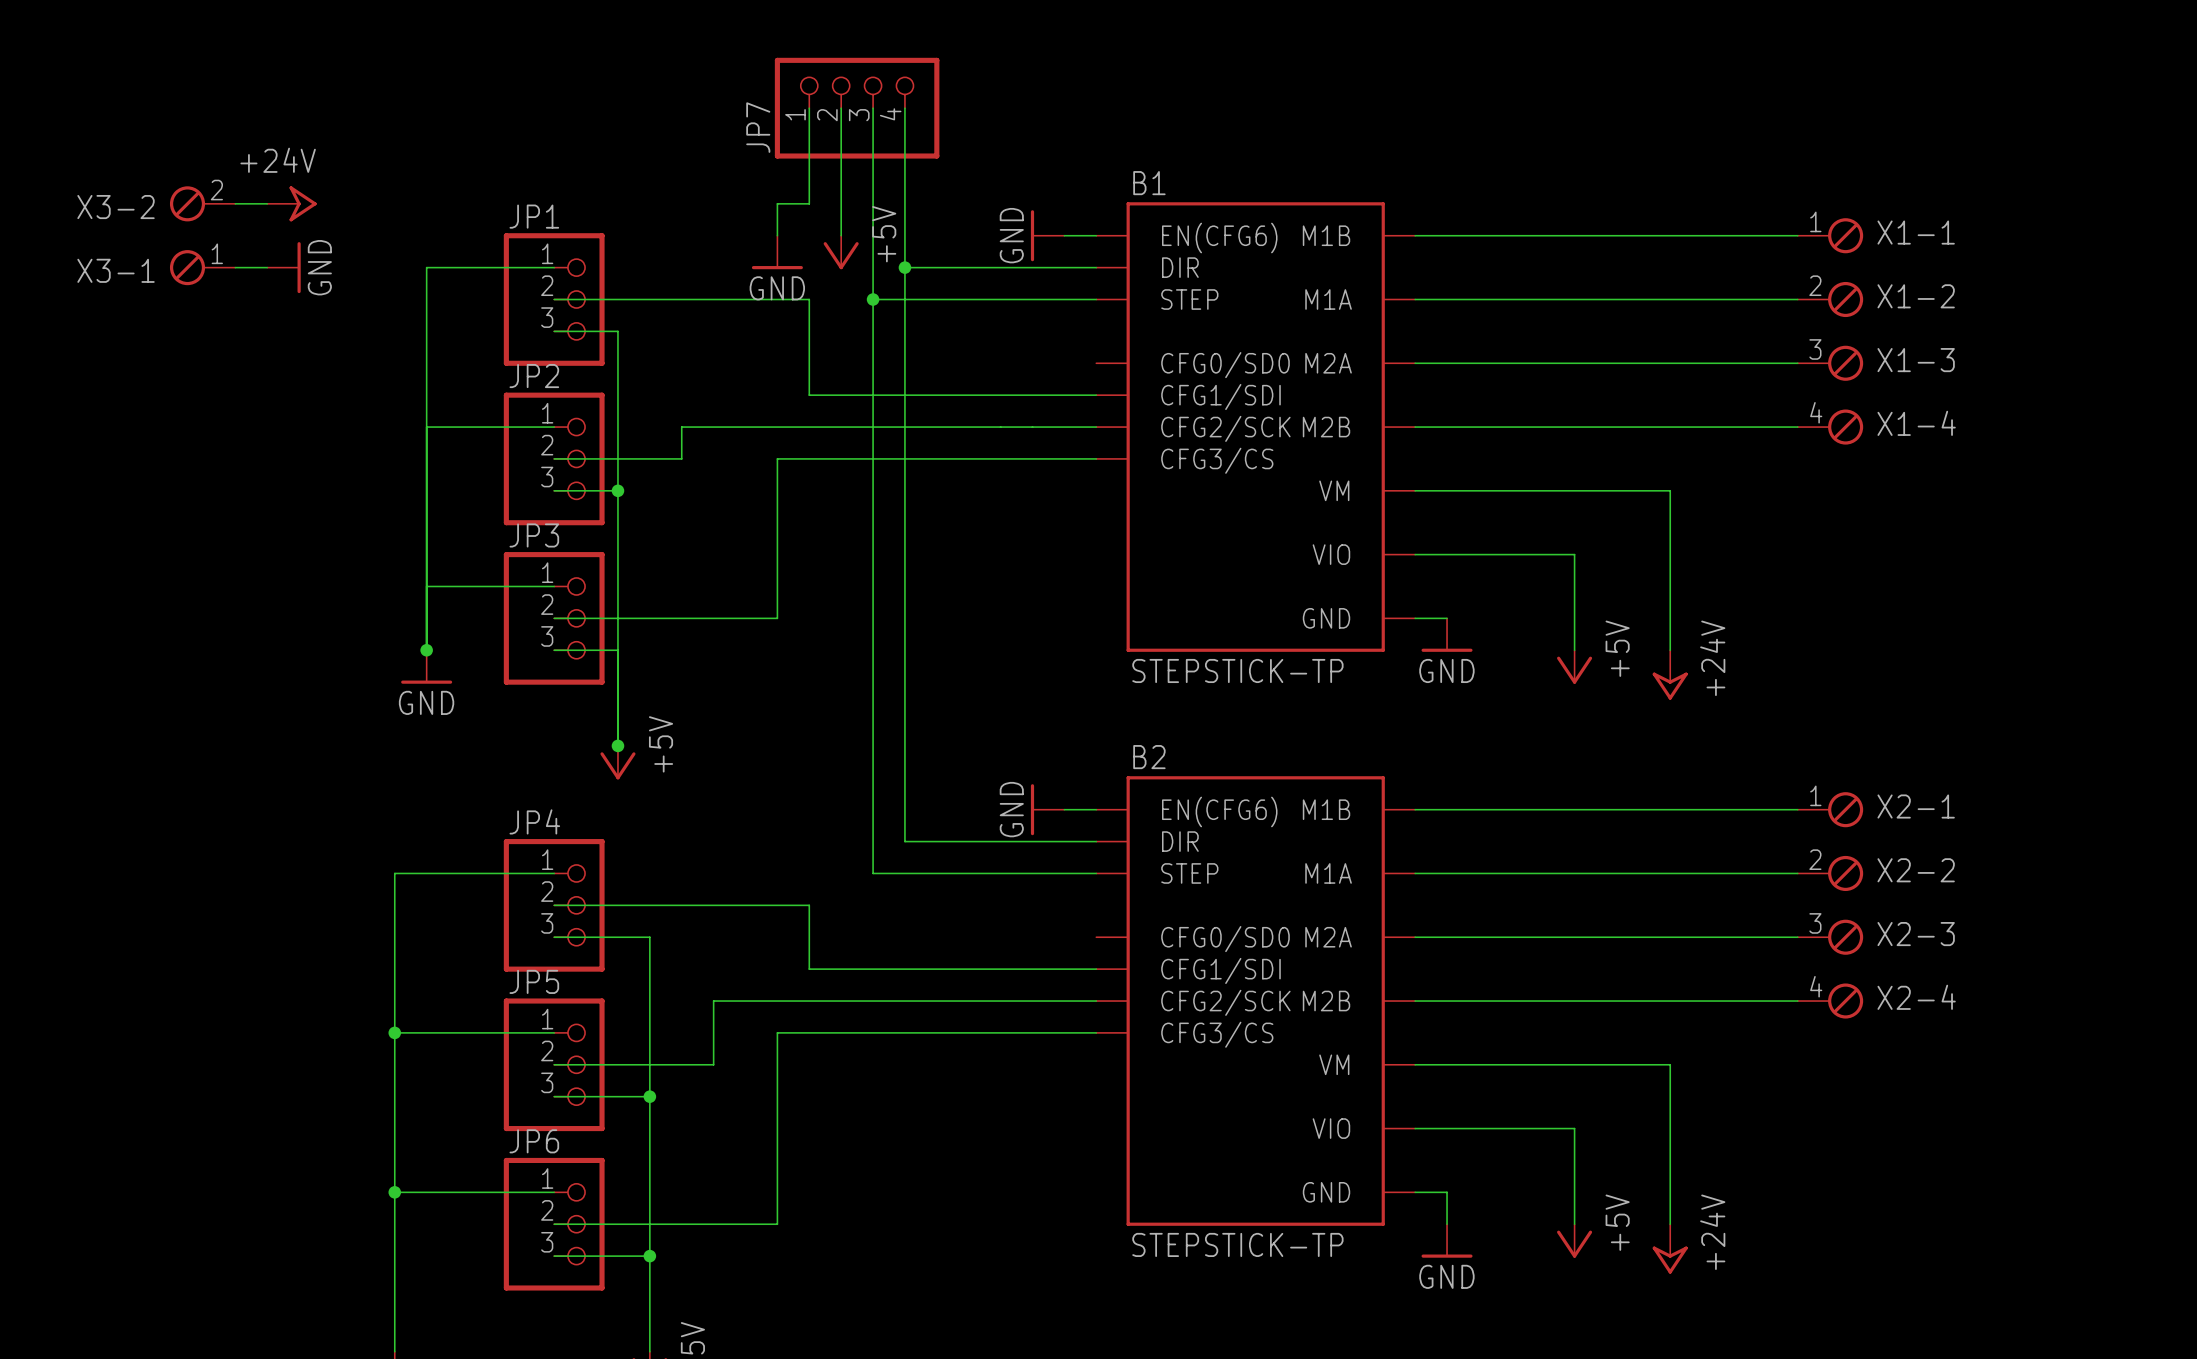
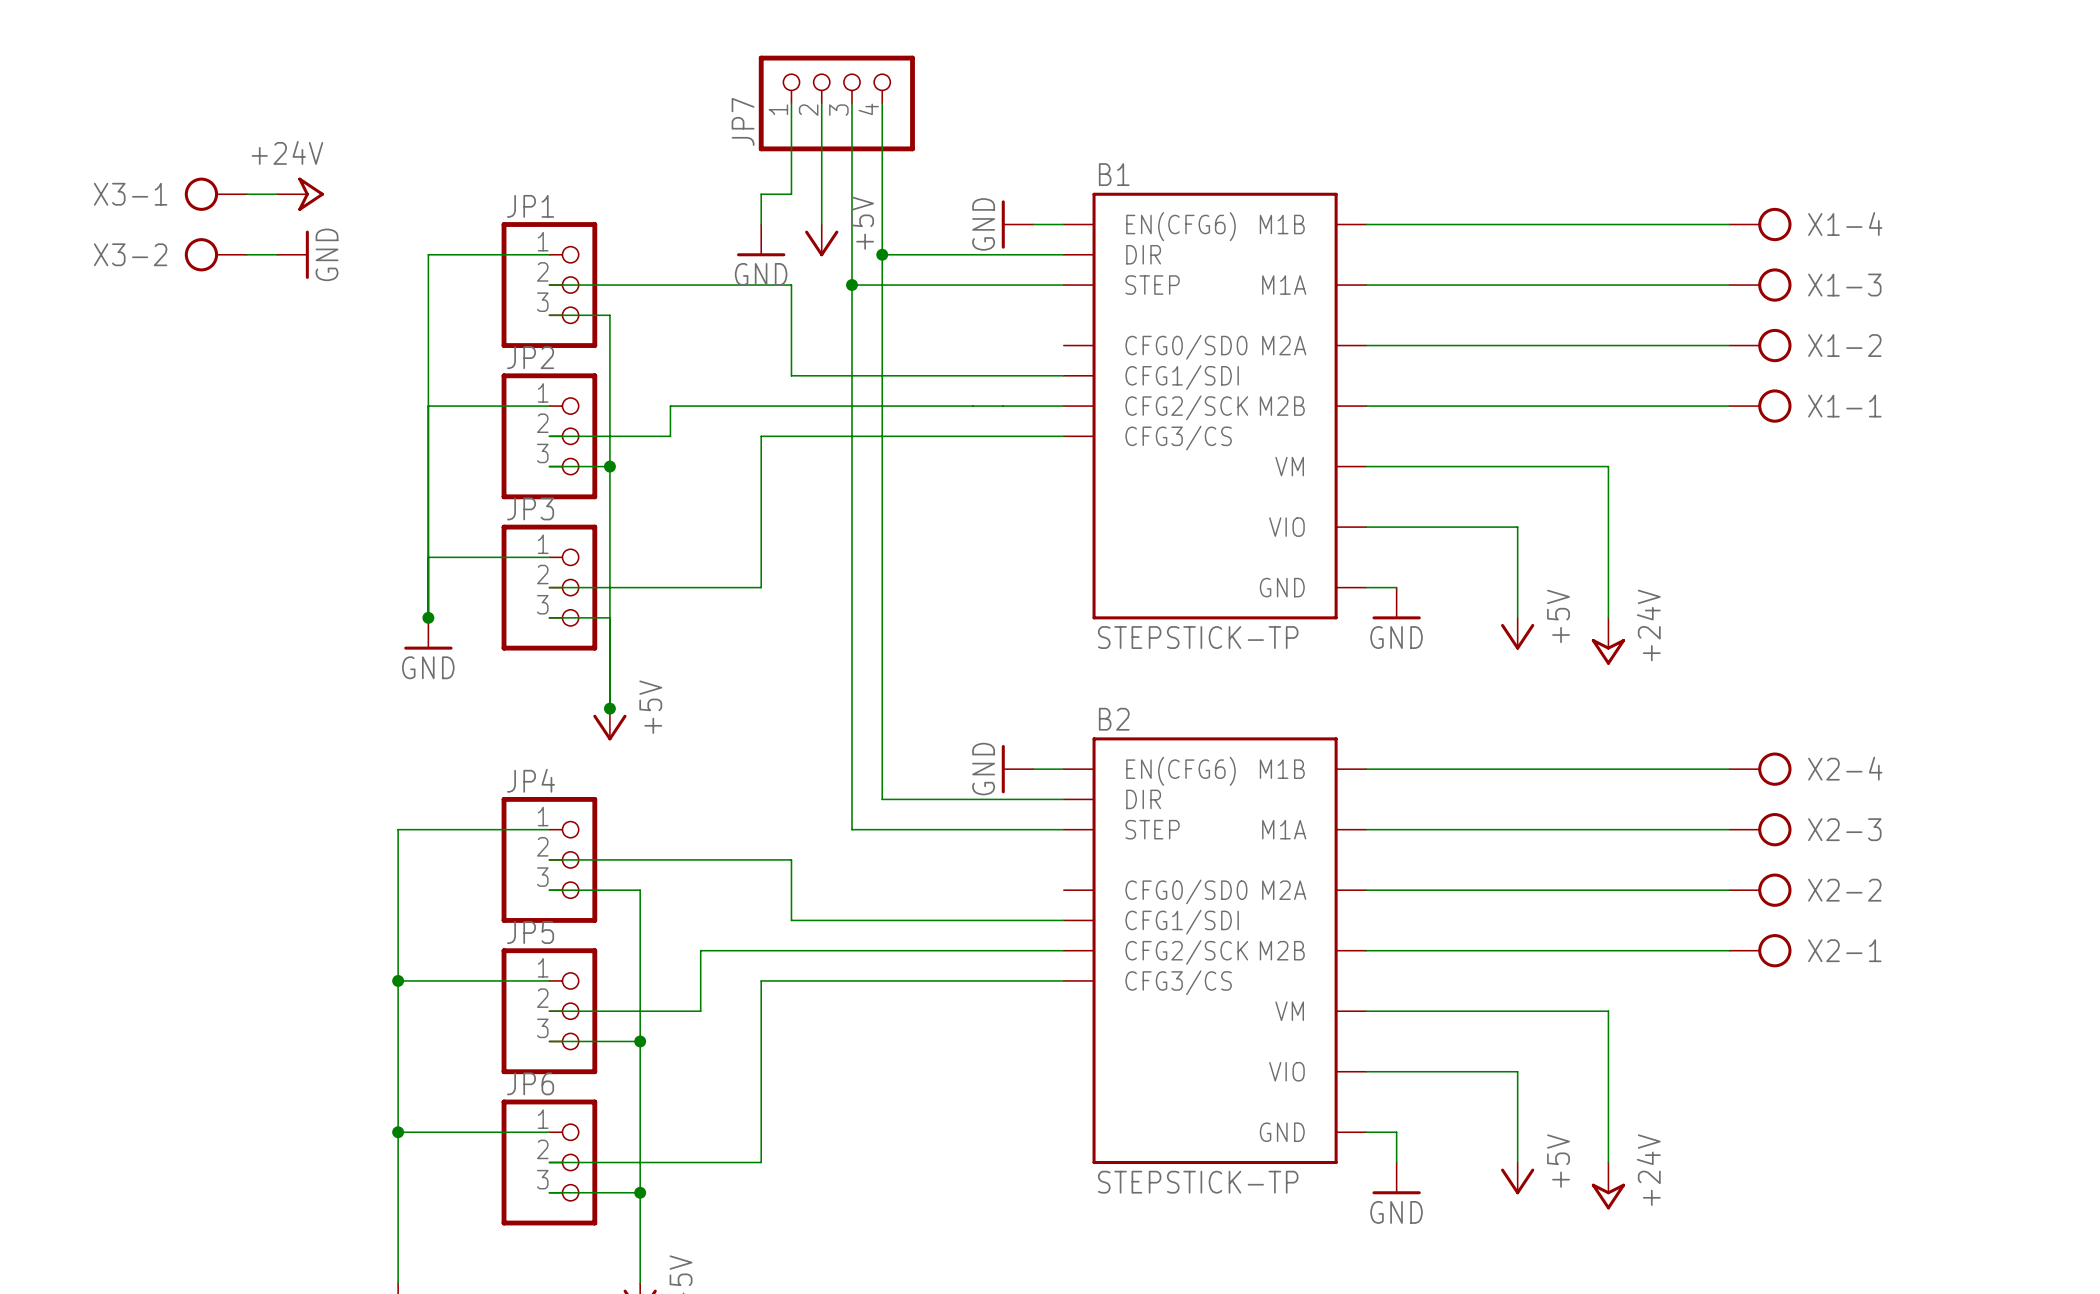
X3-2 symbol: [169, 186, 236, 222] -> [184, 238, 247, 272]
X1-1 symbol: [1797, 218, 1864, 254] -> [1729, 389, 1792, 423]
X3-1 symbol: [169, 250, 236, 286] -> [184, 177, 247, 211]
X1-2 symbol: [1797, 281, 1864, 318] -> [1729, 328, 1792, 363]
X1-3 symbol: [1797, 345, 1864, 381] -> [1729, 268, 1792, 302]
X1-4 symbol: [1797, 409, 1864, 445] -> [1729, 207, 1792, 242]
X2-1 symbol: [1797, 792, 1864, 828] -> [1729, 934, 1792, 968]
X2-2 symbol: [1797, 855, 1864, 892] -> [1729, 873, 1792, 907]
X2-3 symbol: [1797, 919, 1864, 955] -> [1729, 813, 1792, 847]
X2-4 symbol: [1797, 983, 1864, 1019] -> [1729, 752, 1792, 786]

